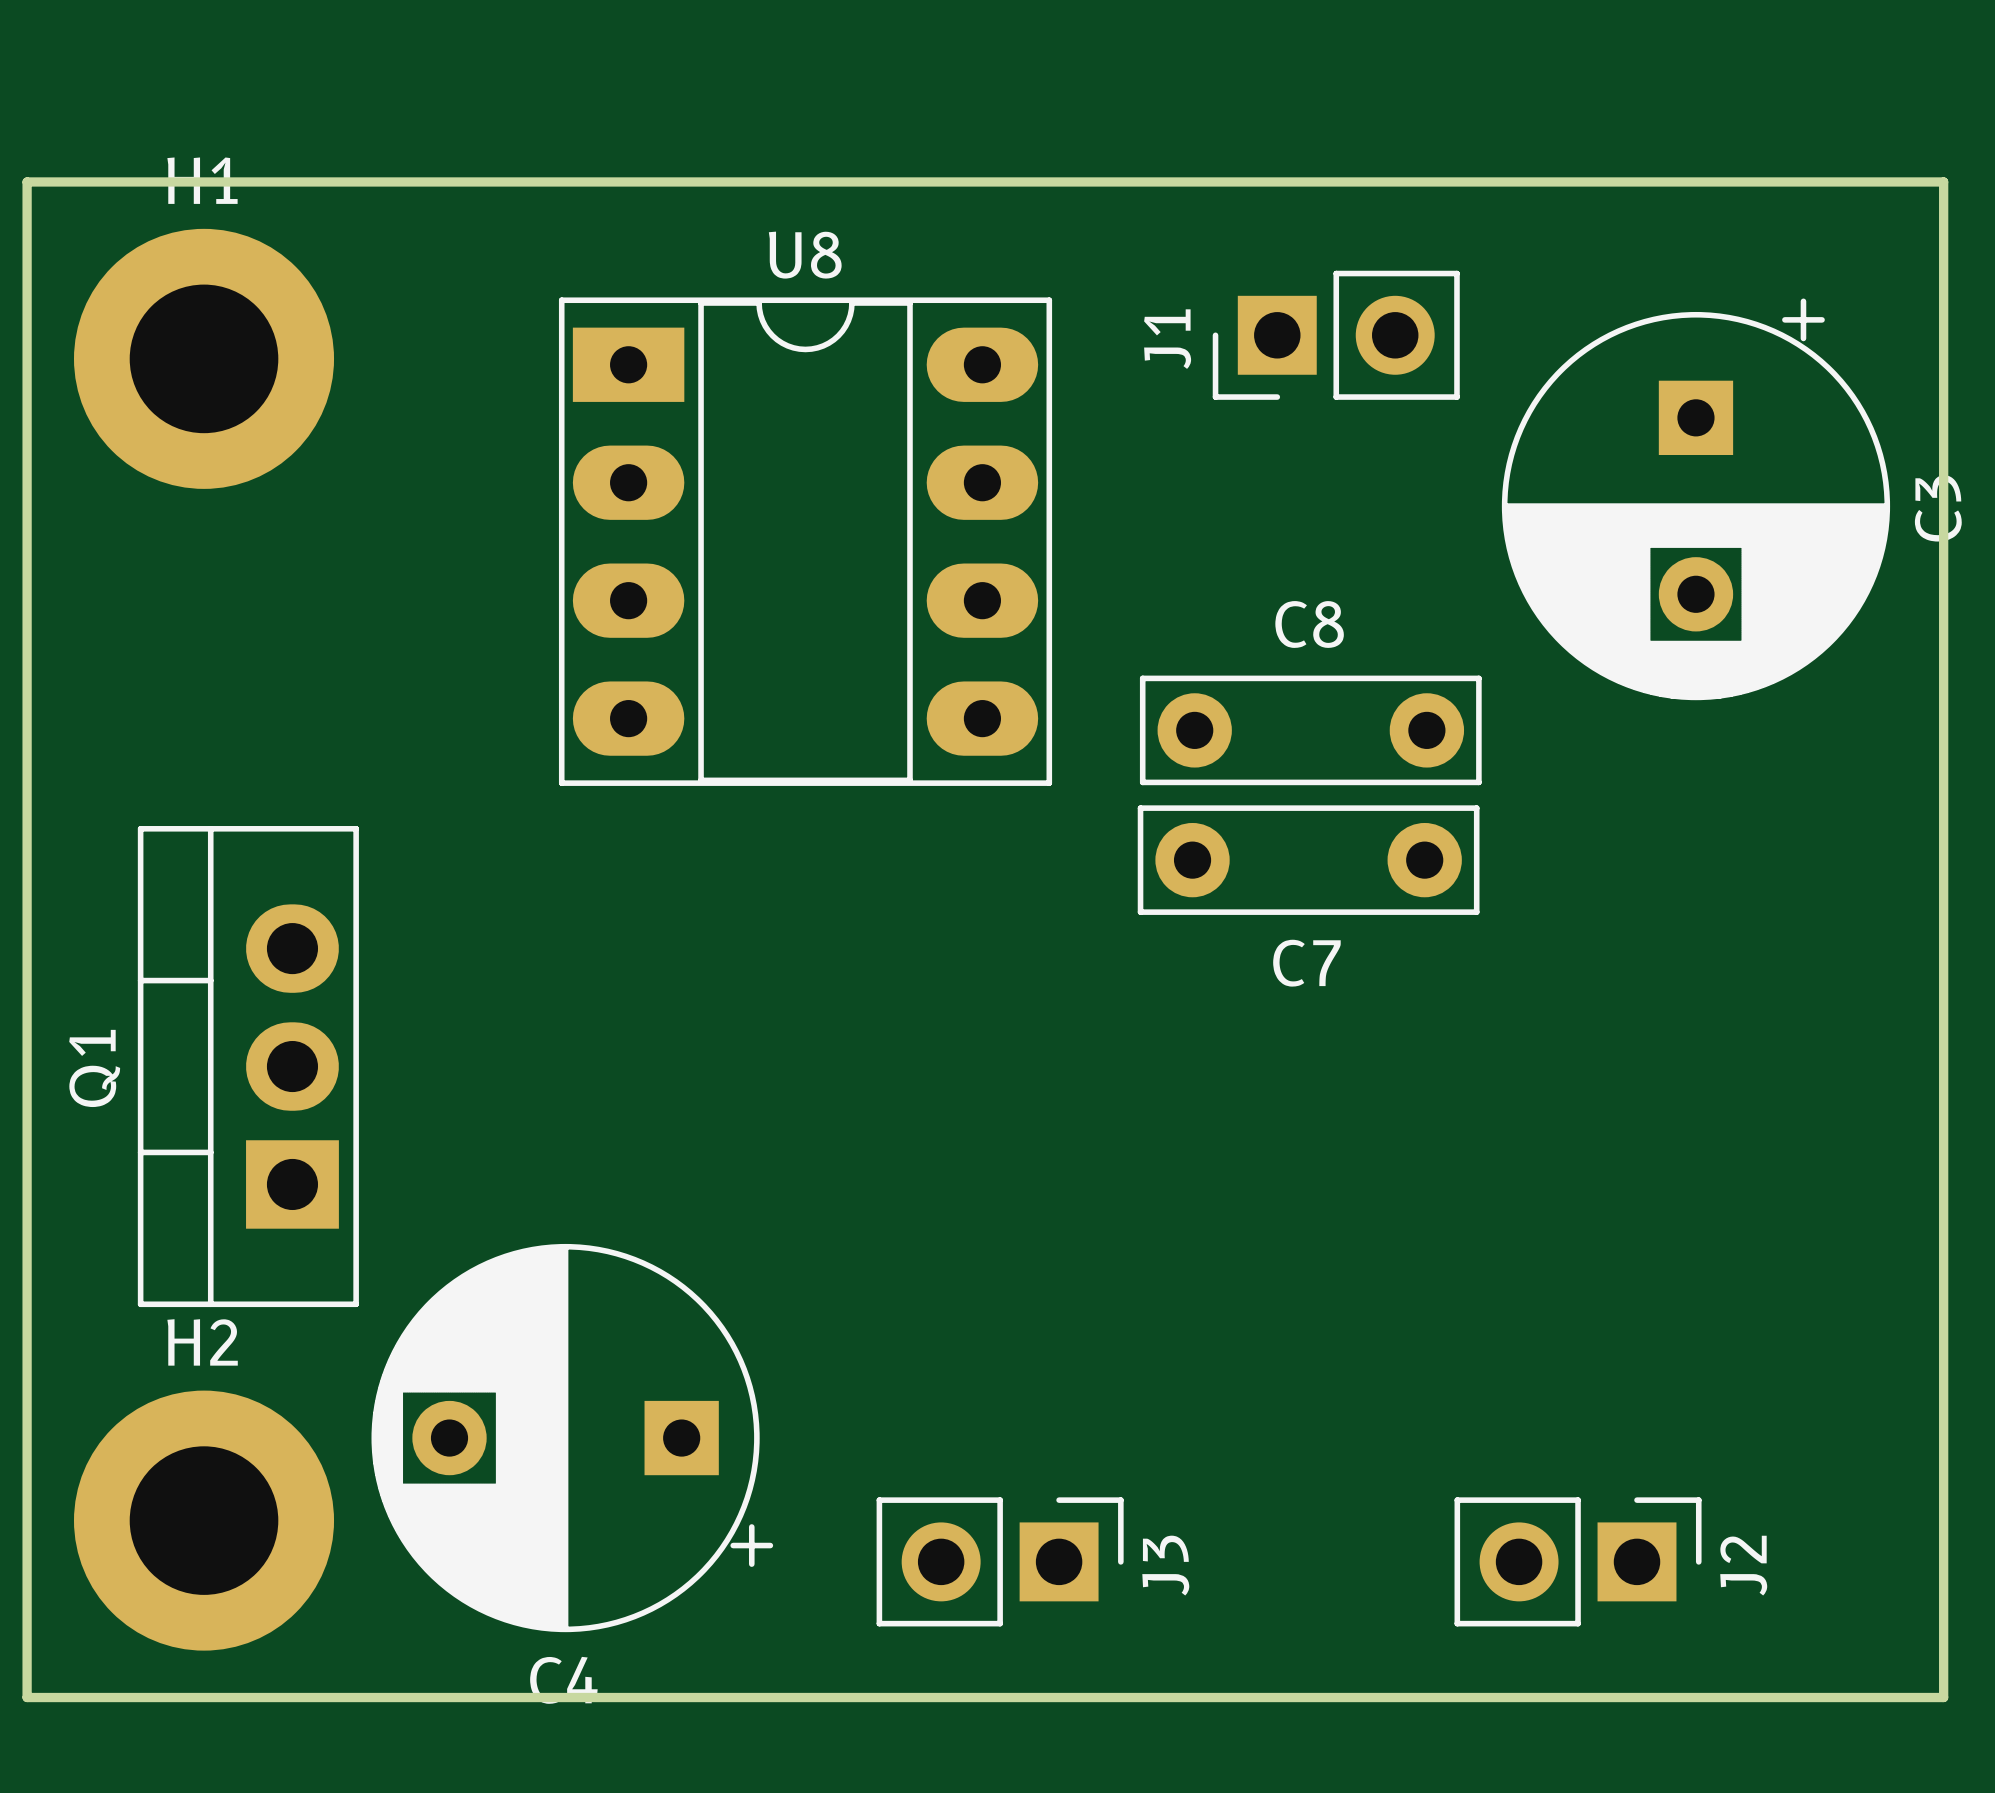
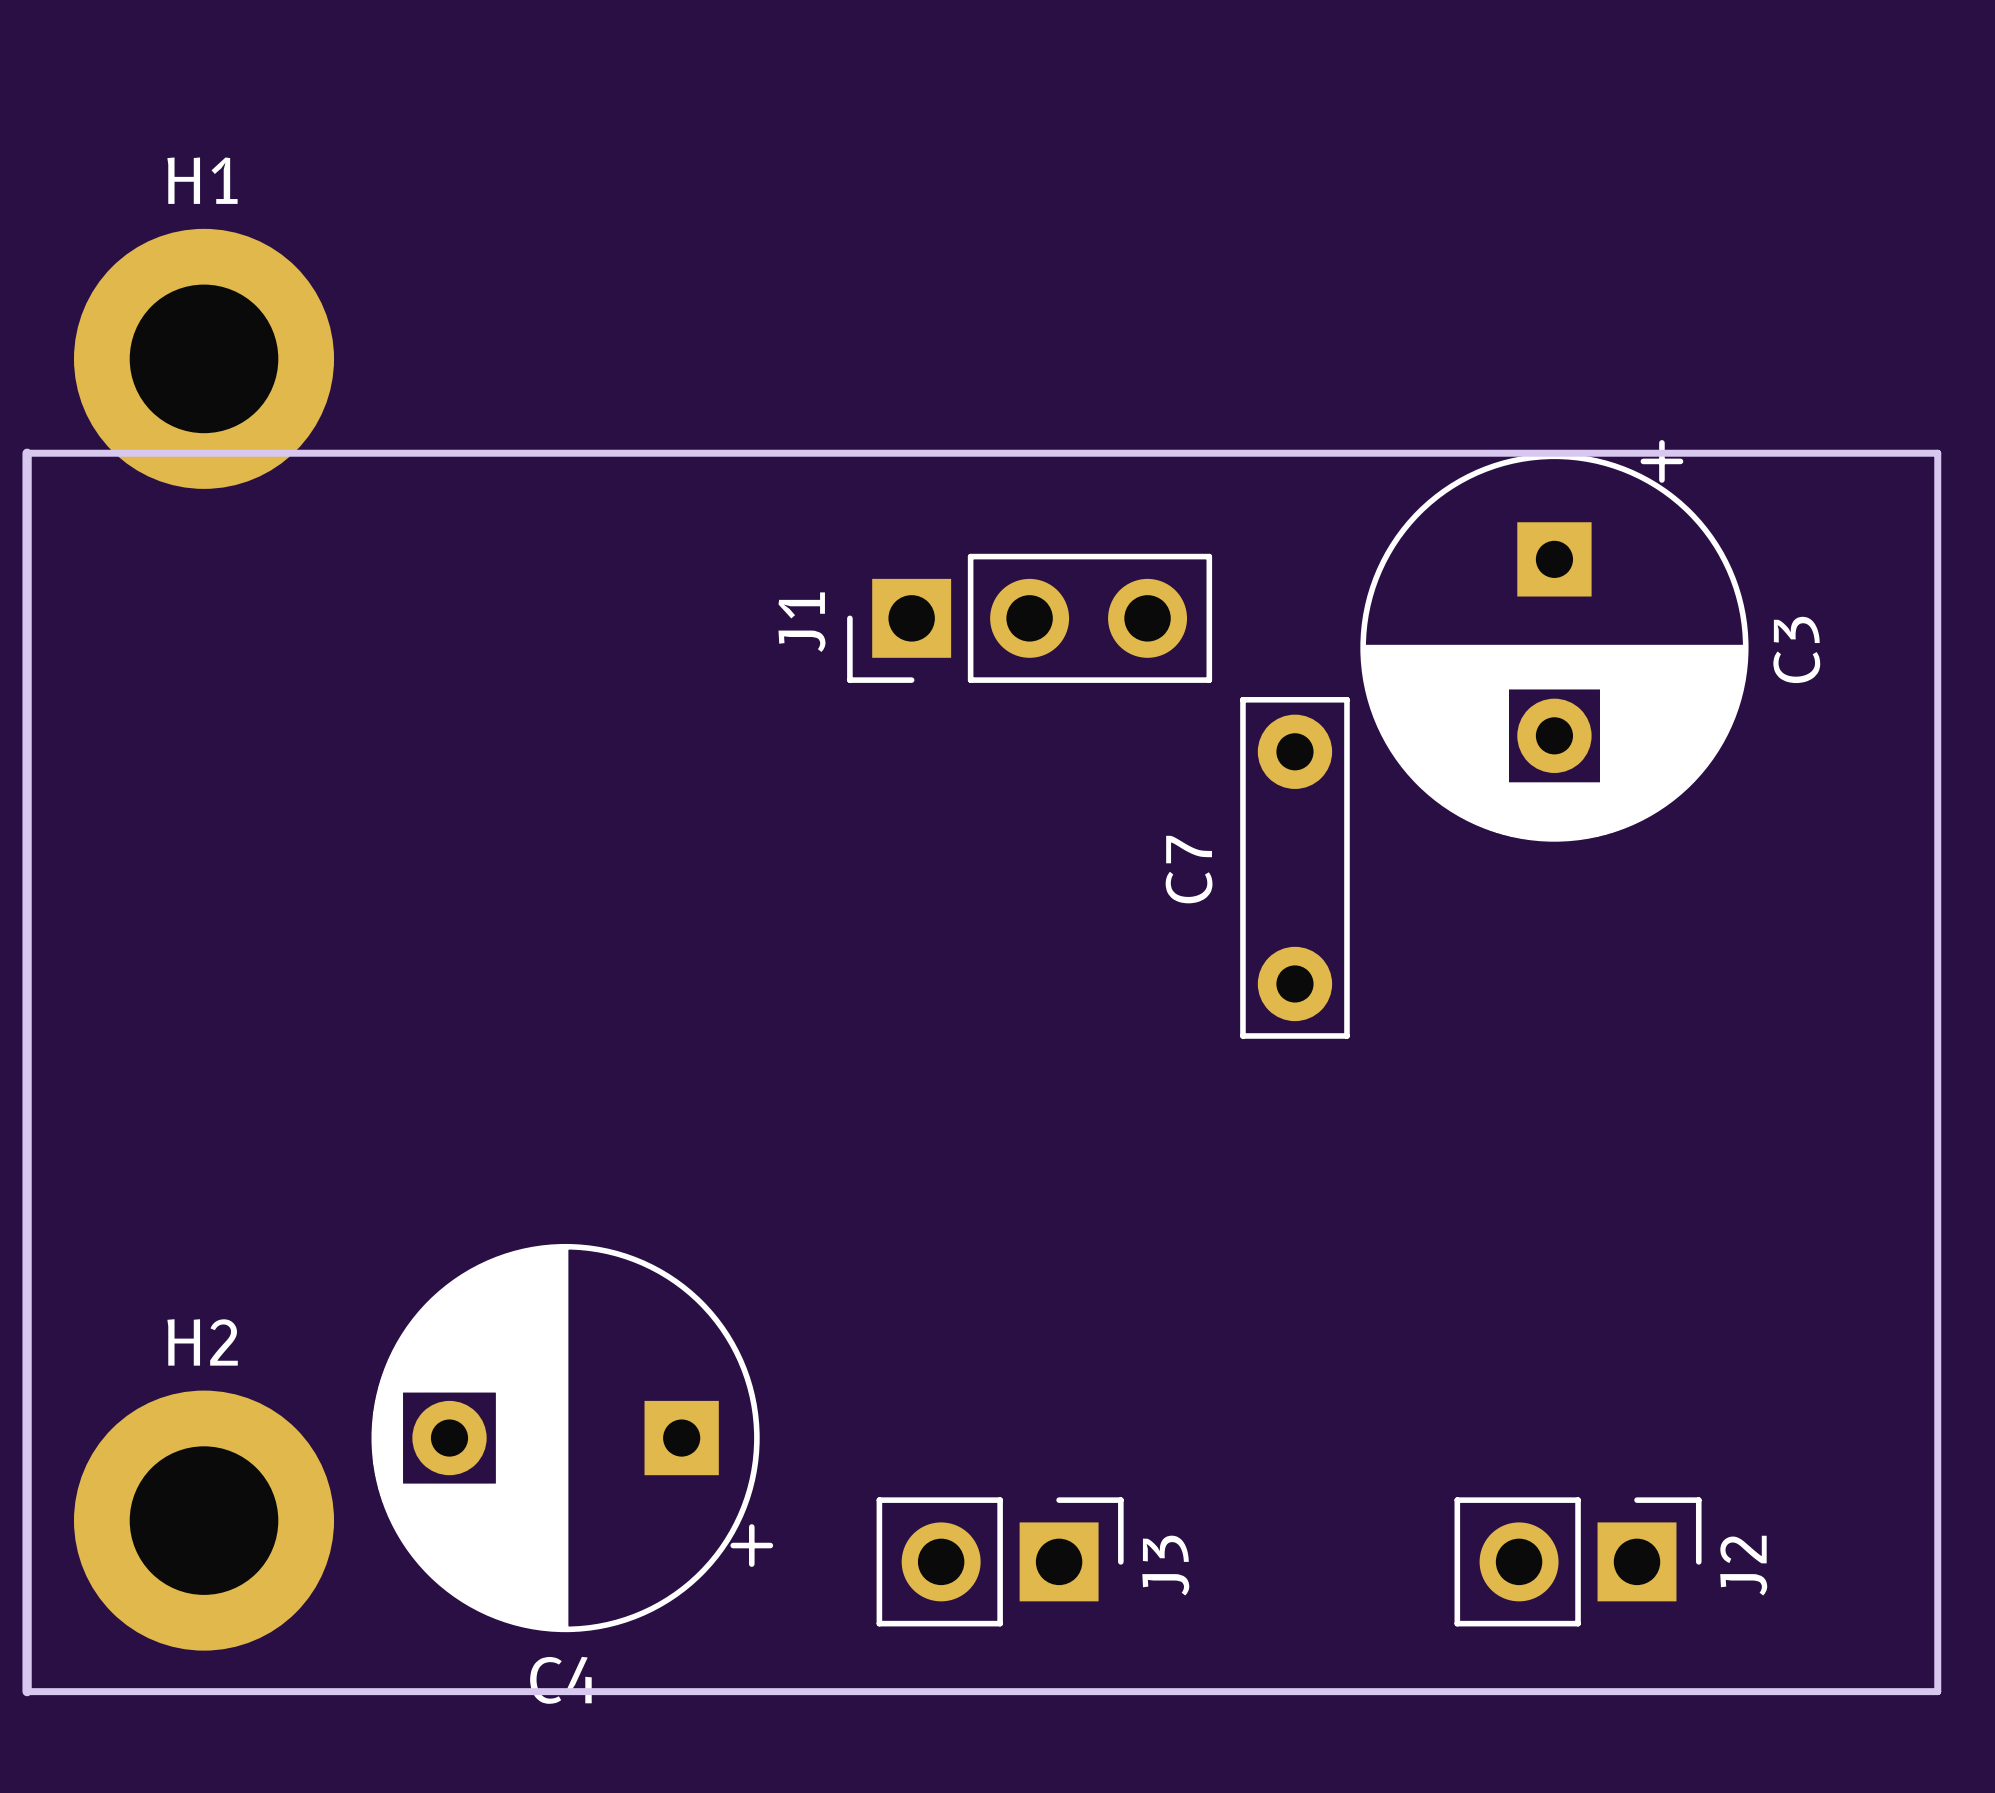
J1 footprint: [1212, 270, 1460, 400] -> [847, 553, 1213, 683]
board edge: (27, 453) (27, 181) (1943, 181) (1943, 1697) (27, 1697) (27, 1691) -> (27, 453) (1937, 453) (1937, 1691) (27, 1691)
C3 position: (1695, 499) -> (1554, 640)
U8: (805, 541) -> none
C8: (1310, 730) -> none
C7 rotation: 0° (1308, 860) -> 90° clockwise (1294, 867)
Q1: (248, 1066) -> none

